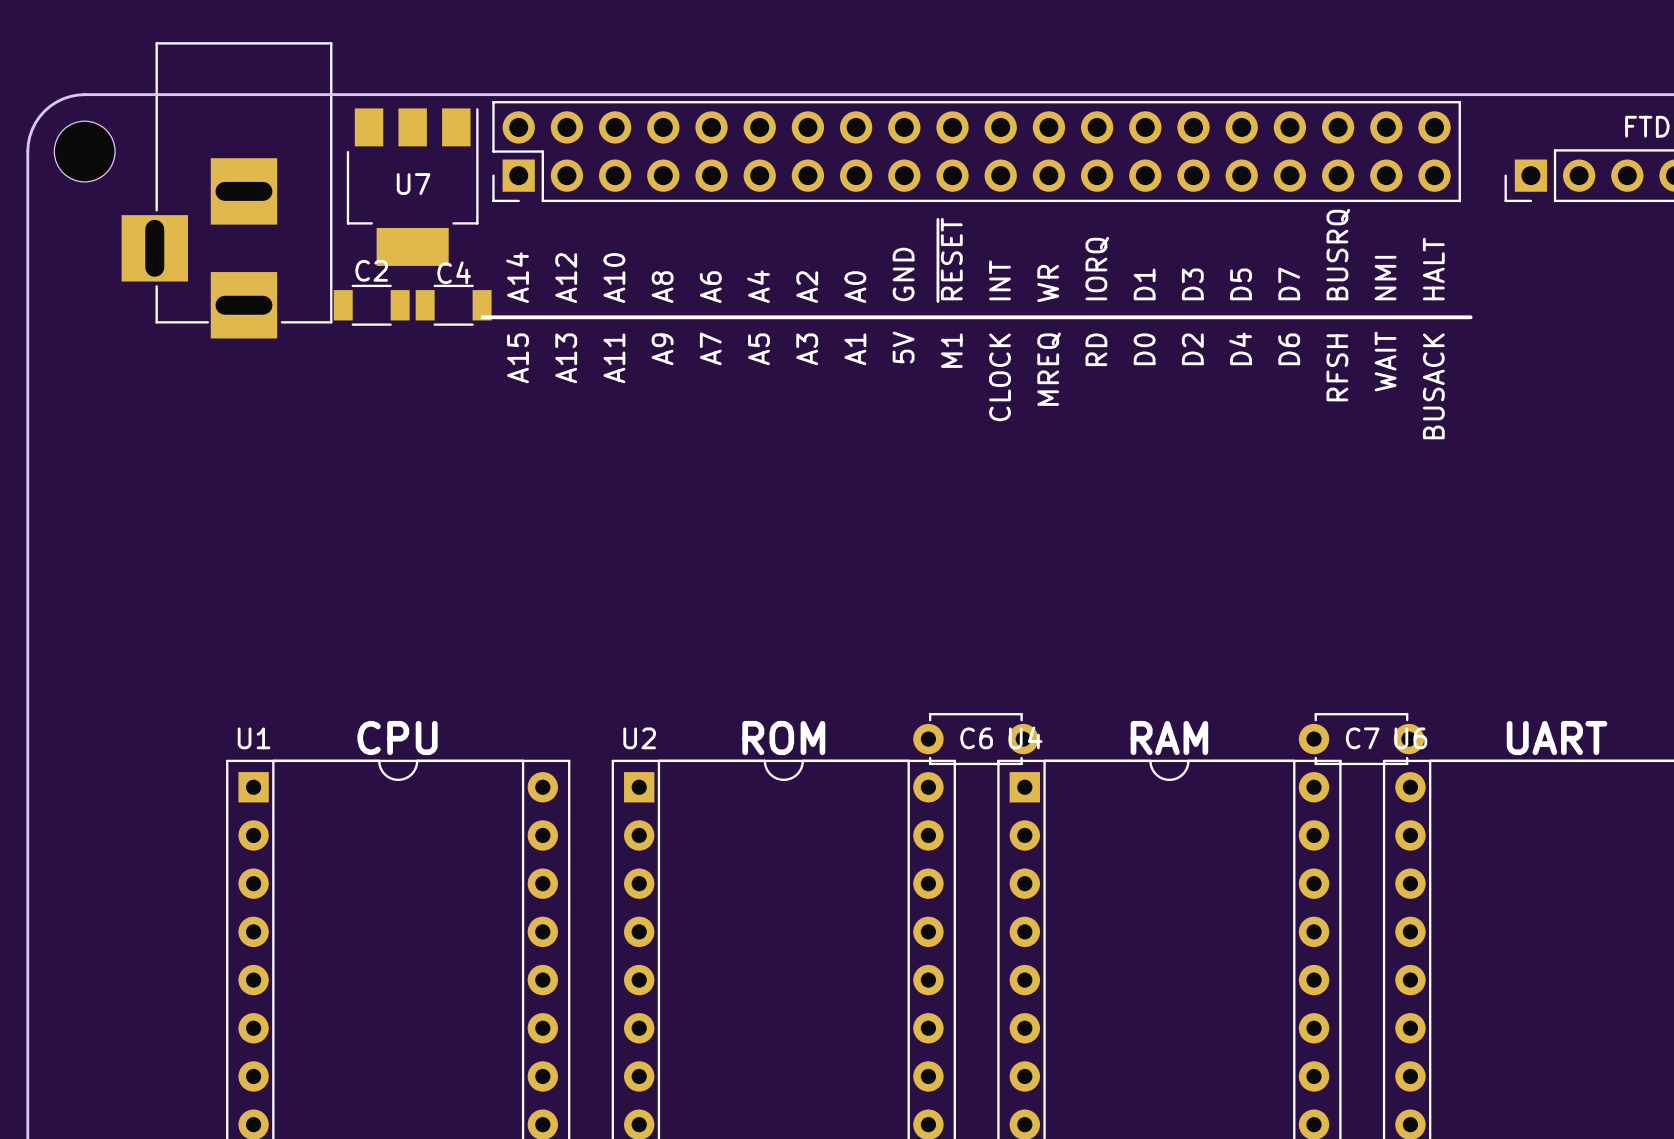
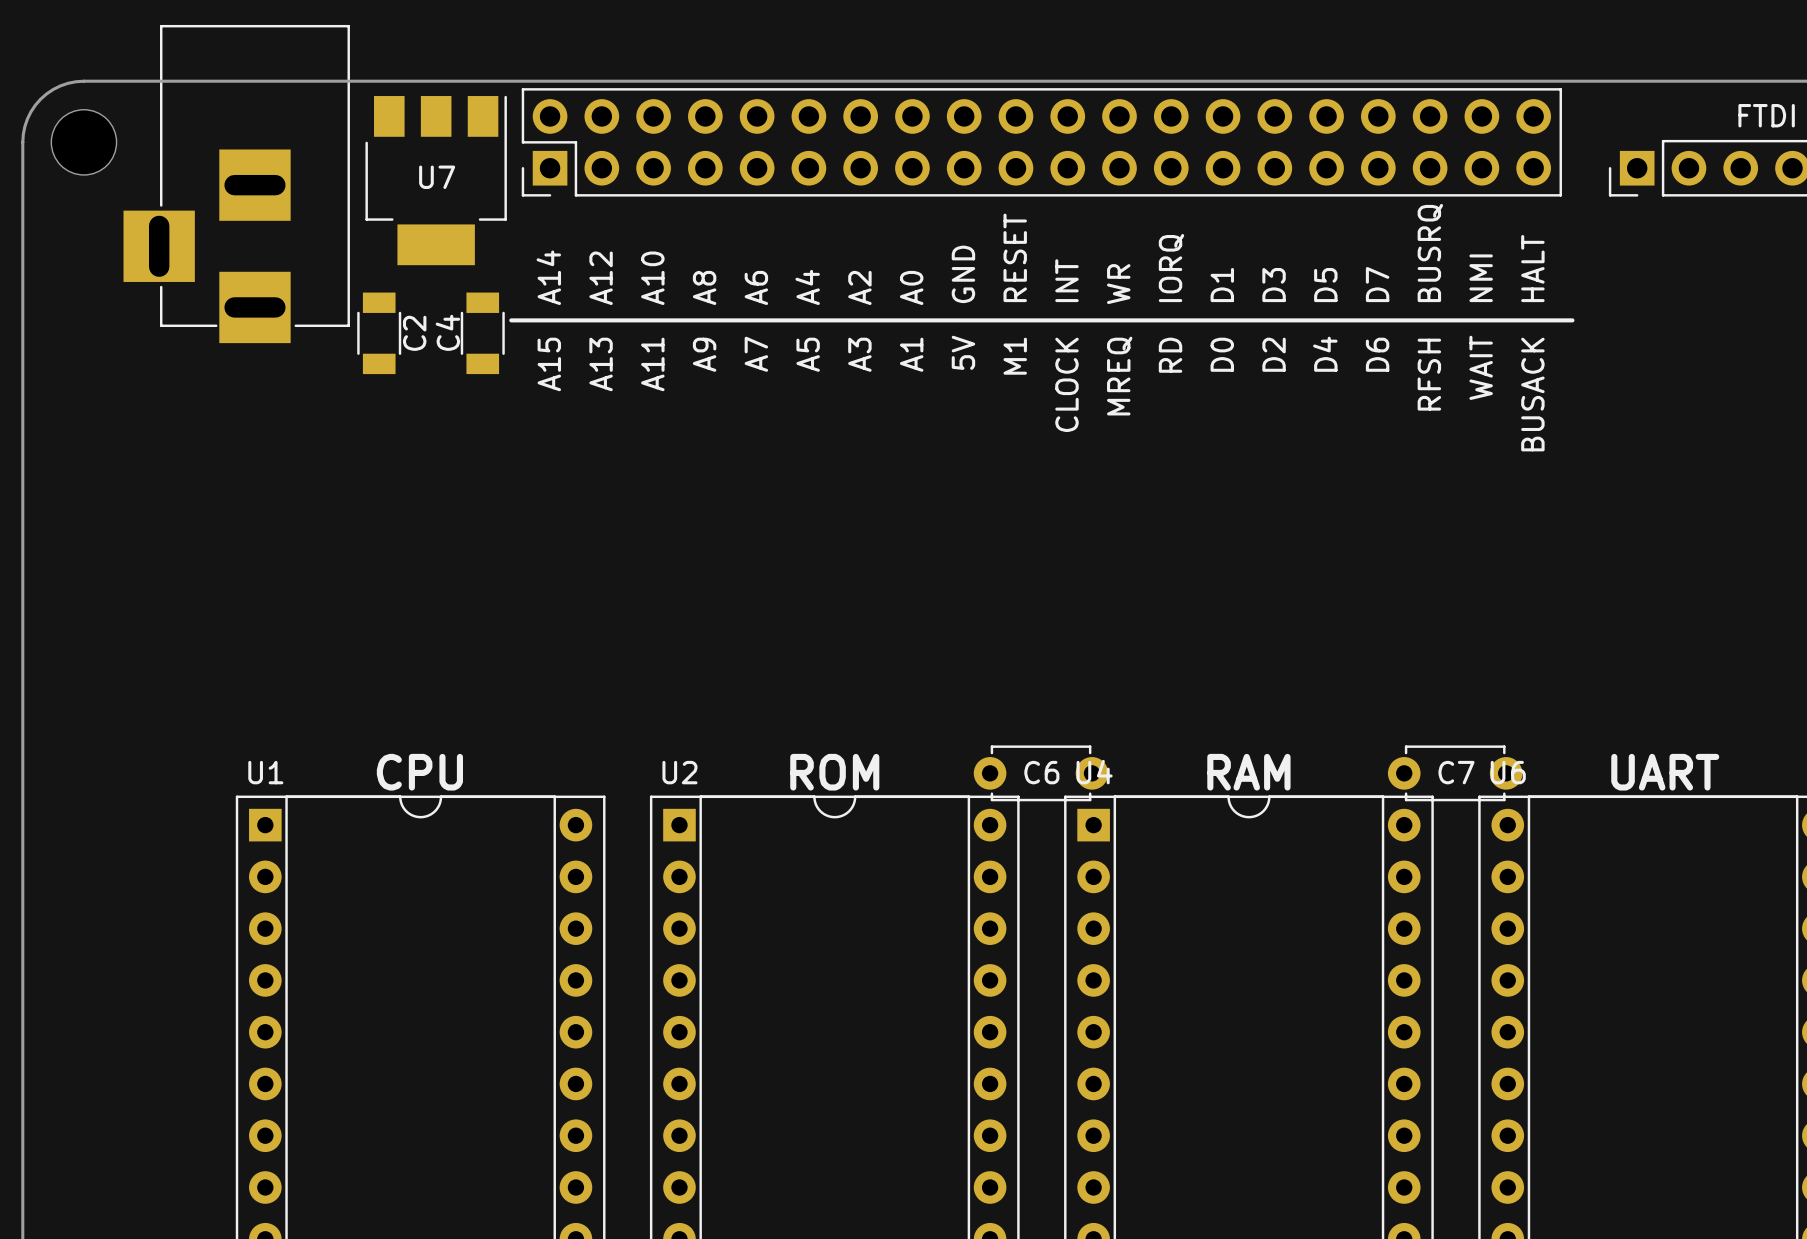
text: ~{RESET} (949, 260) -> RESET (1015, 257)
C4 name position: C4 (454, 272) -> C4 (447, 332)
C2 rotation: 0° (371, 305) -> 90° clockwise (379, 333)
C4 rotation: 0° (453, 305) -> 90° clockwise (482, 333)

